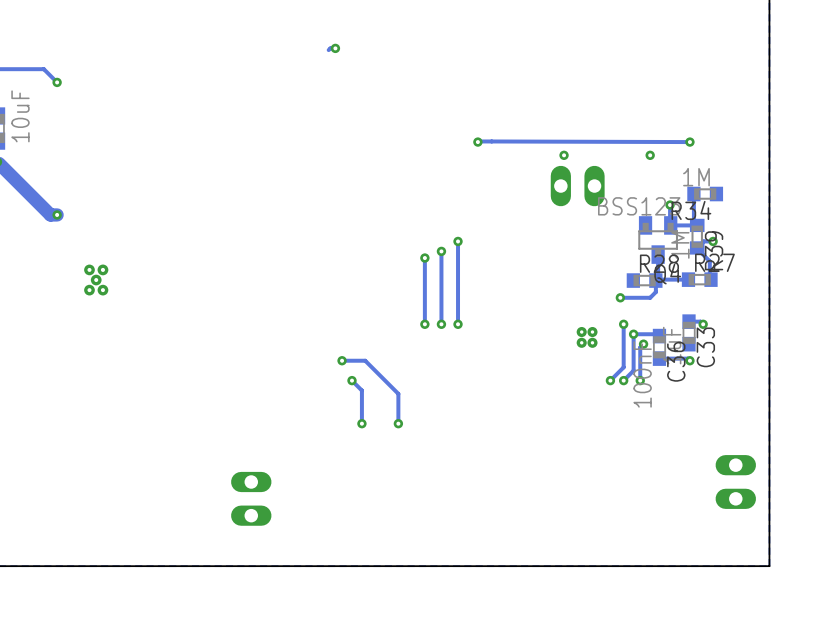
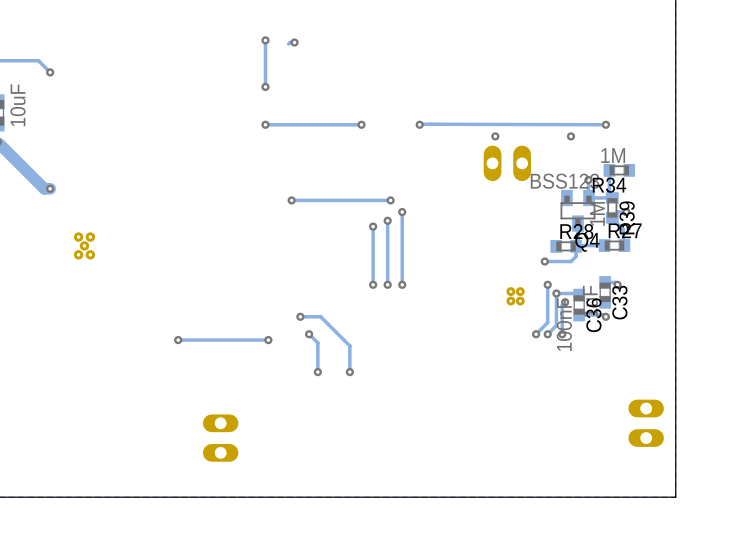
track: none -> (265, 40) (265, 86)
via: none -> (265, 40)
via: none -> (265, 86)
via: none -> (265, 124)
track: none -> (361, 124) (265, 124)
via: none -> (361, 124)
via: none -> (291, 200)
track: none -> (390, 200) (291, 200)
via: none -> (390, 200)
via: none -> (178, 340)
track: none -> (268, 340) (178, 340)
via: none -> (268, 340)

